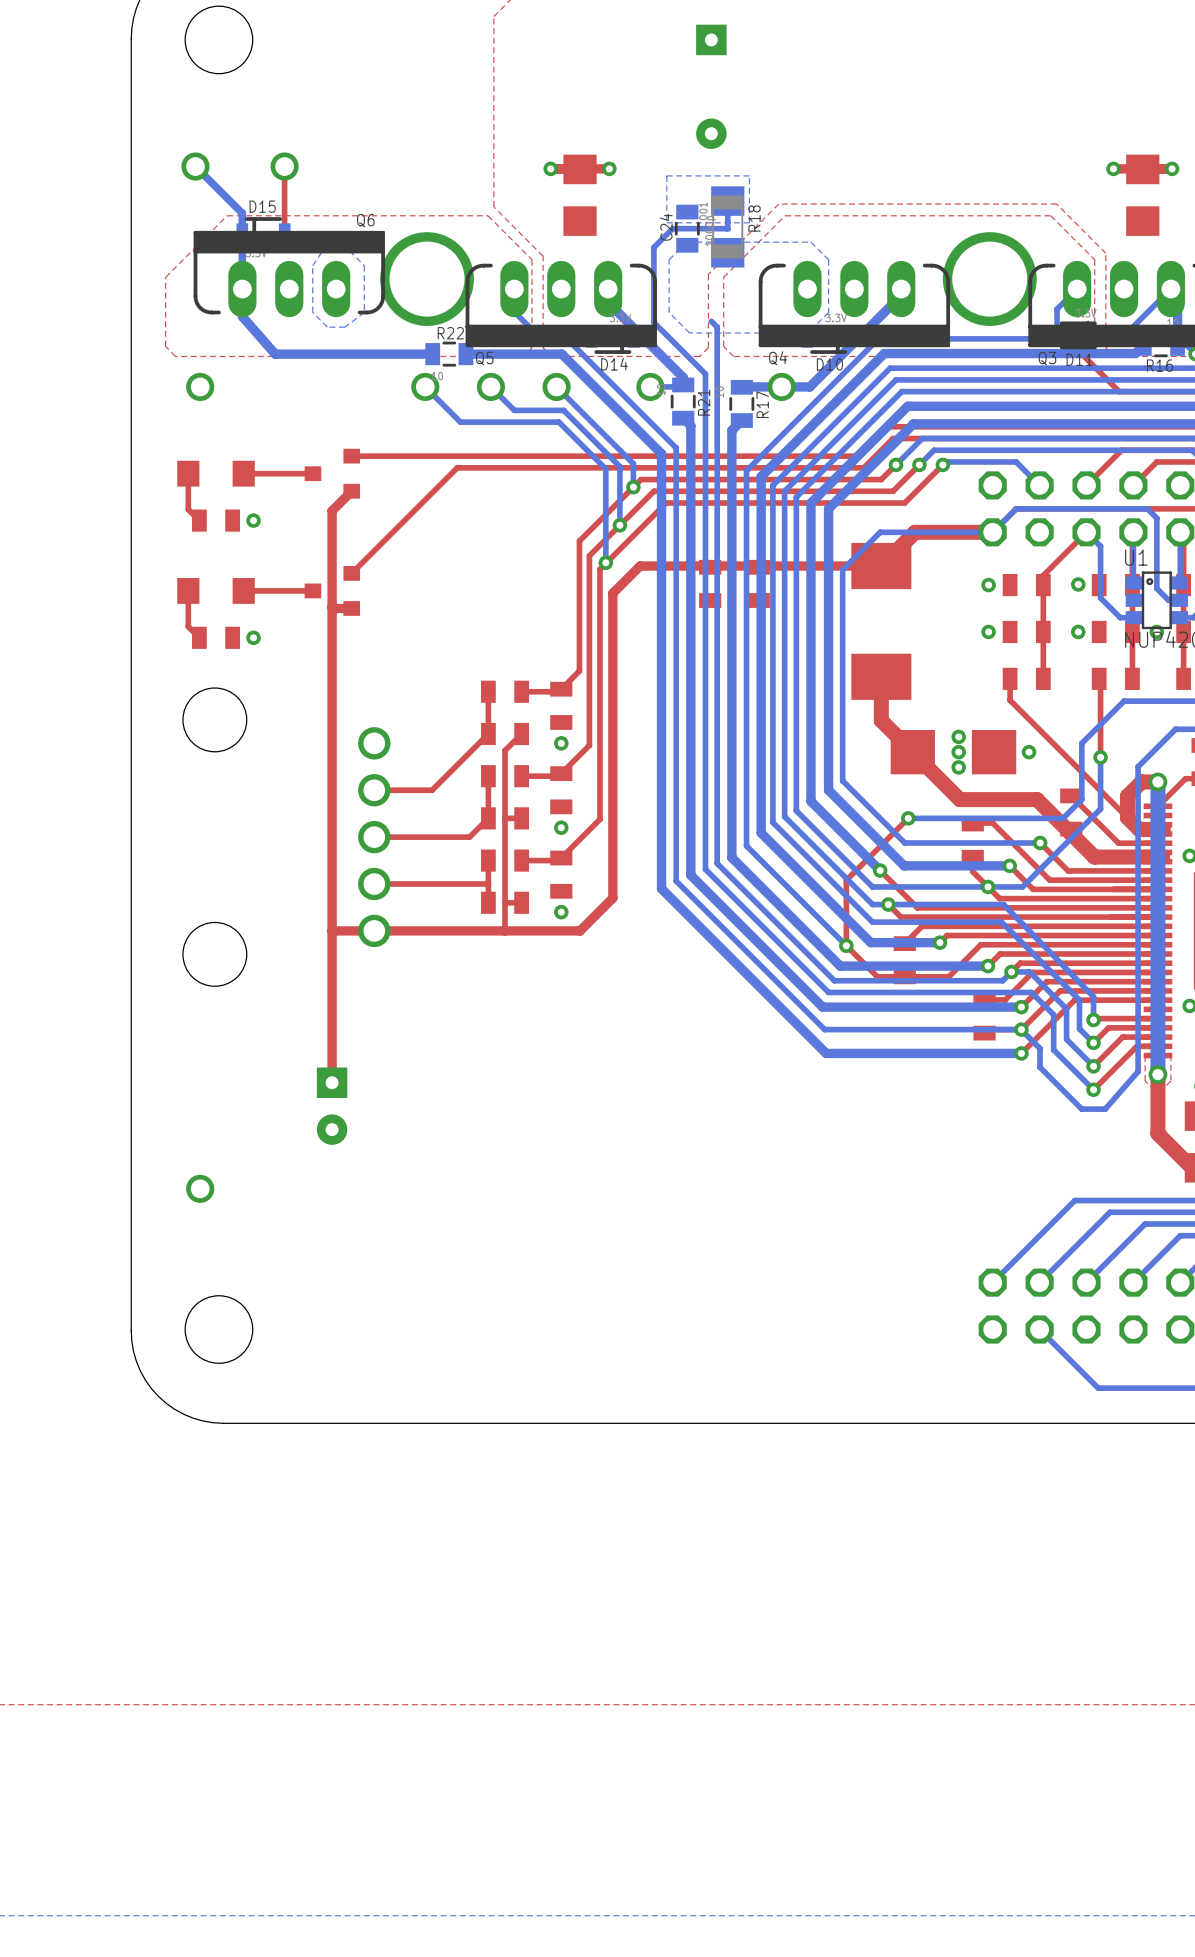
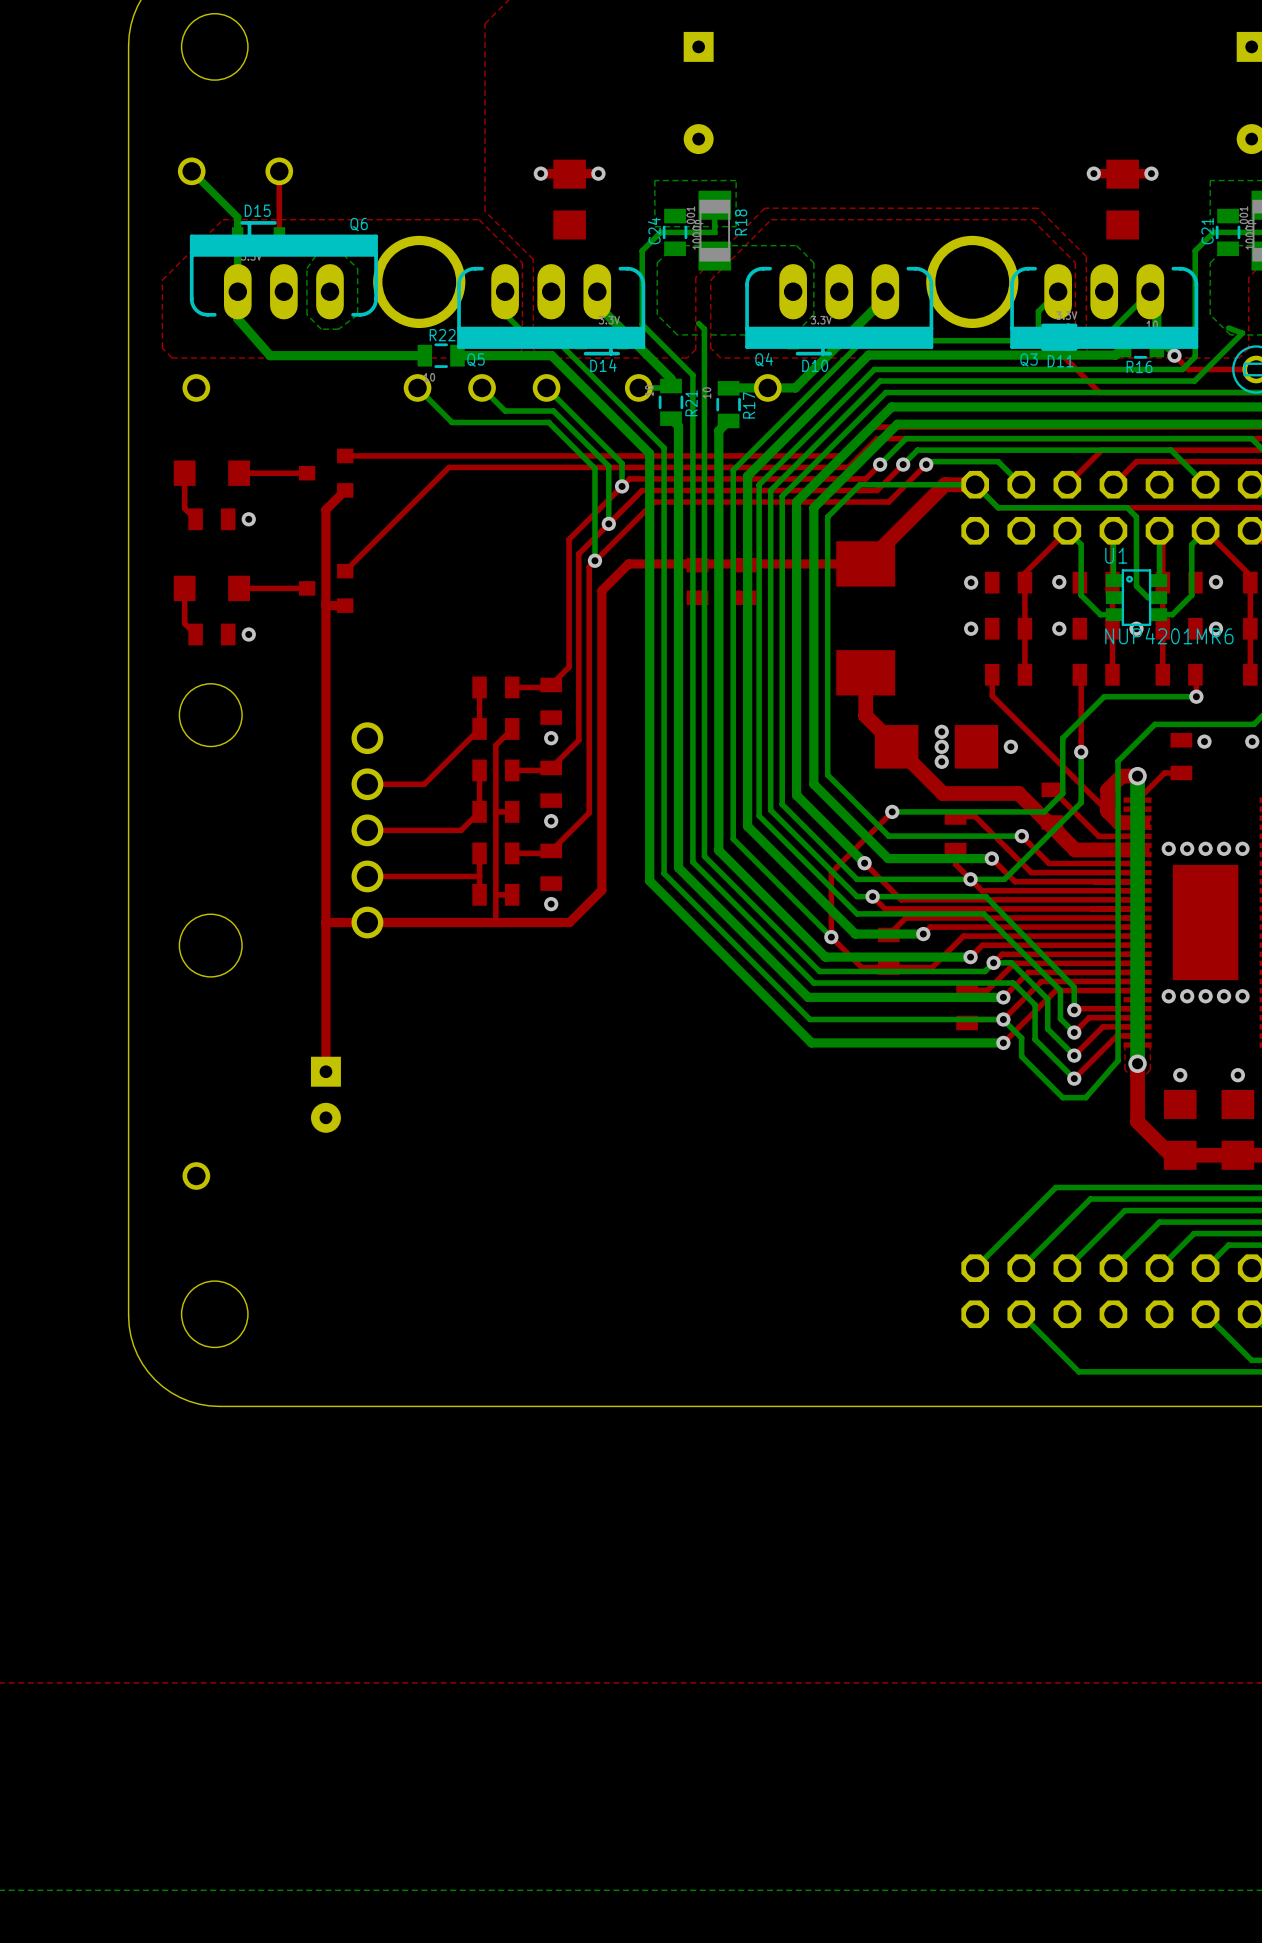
top track: (1016, 508) (992, 532) (915, 532) -> (998, 507) (975, 484) (944, 484) (898, 530)
bottom track: (1016, 508) (992, 532) (880, 532) (842, 569) -> (998, 507) (975, 484) (859, 484) (827, 516) (827, 567)

